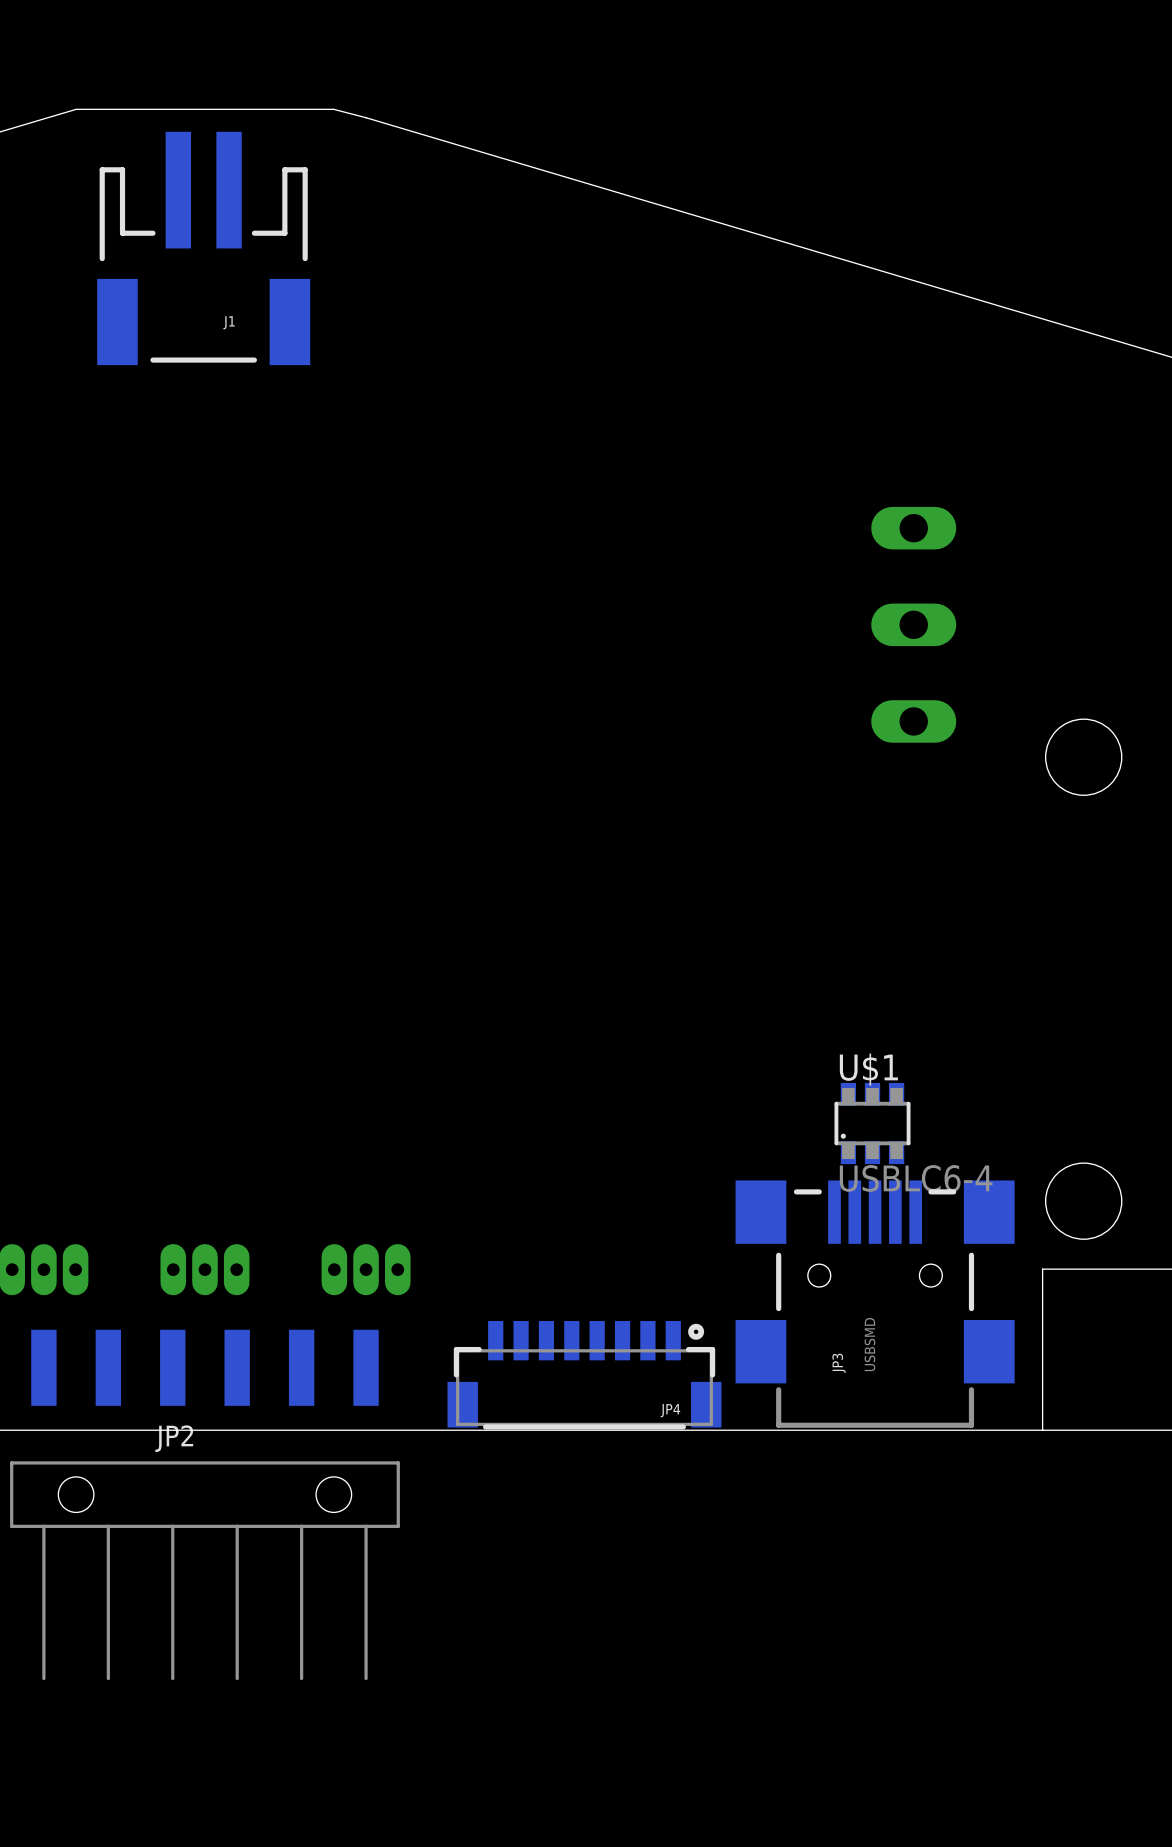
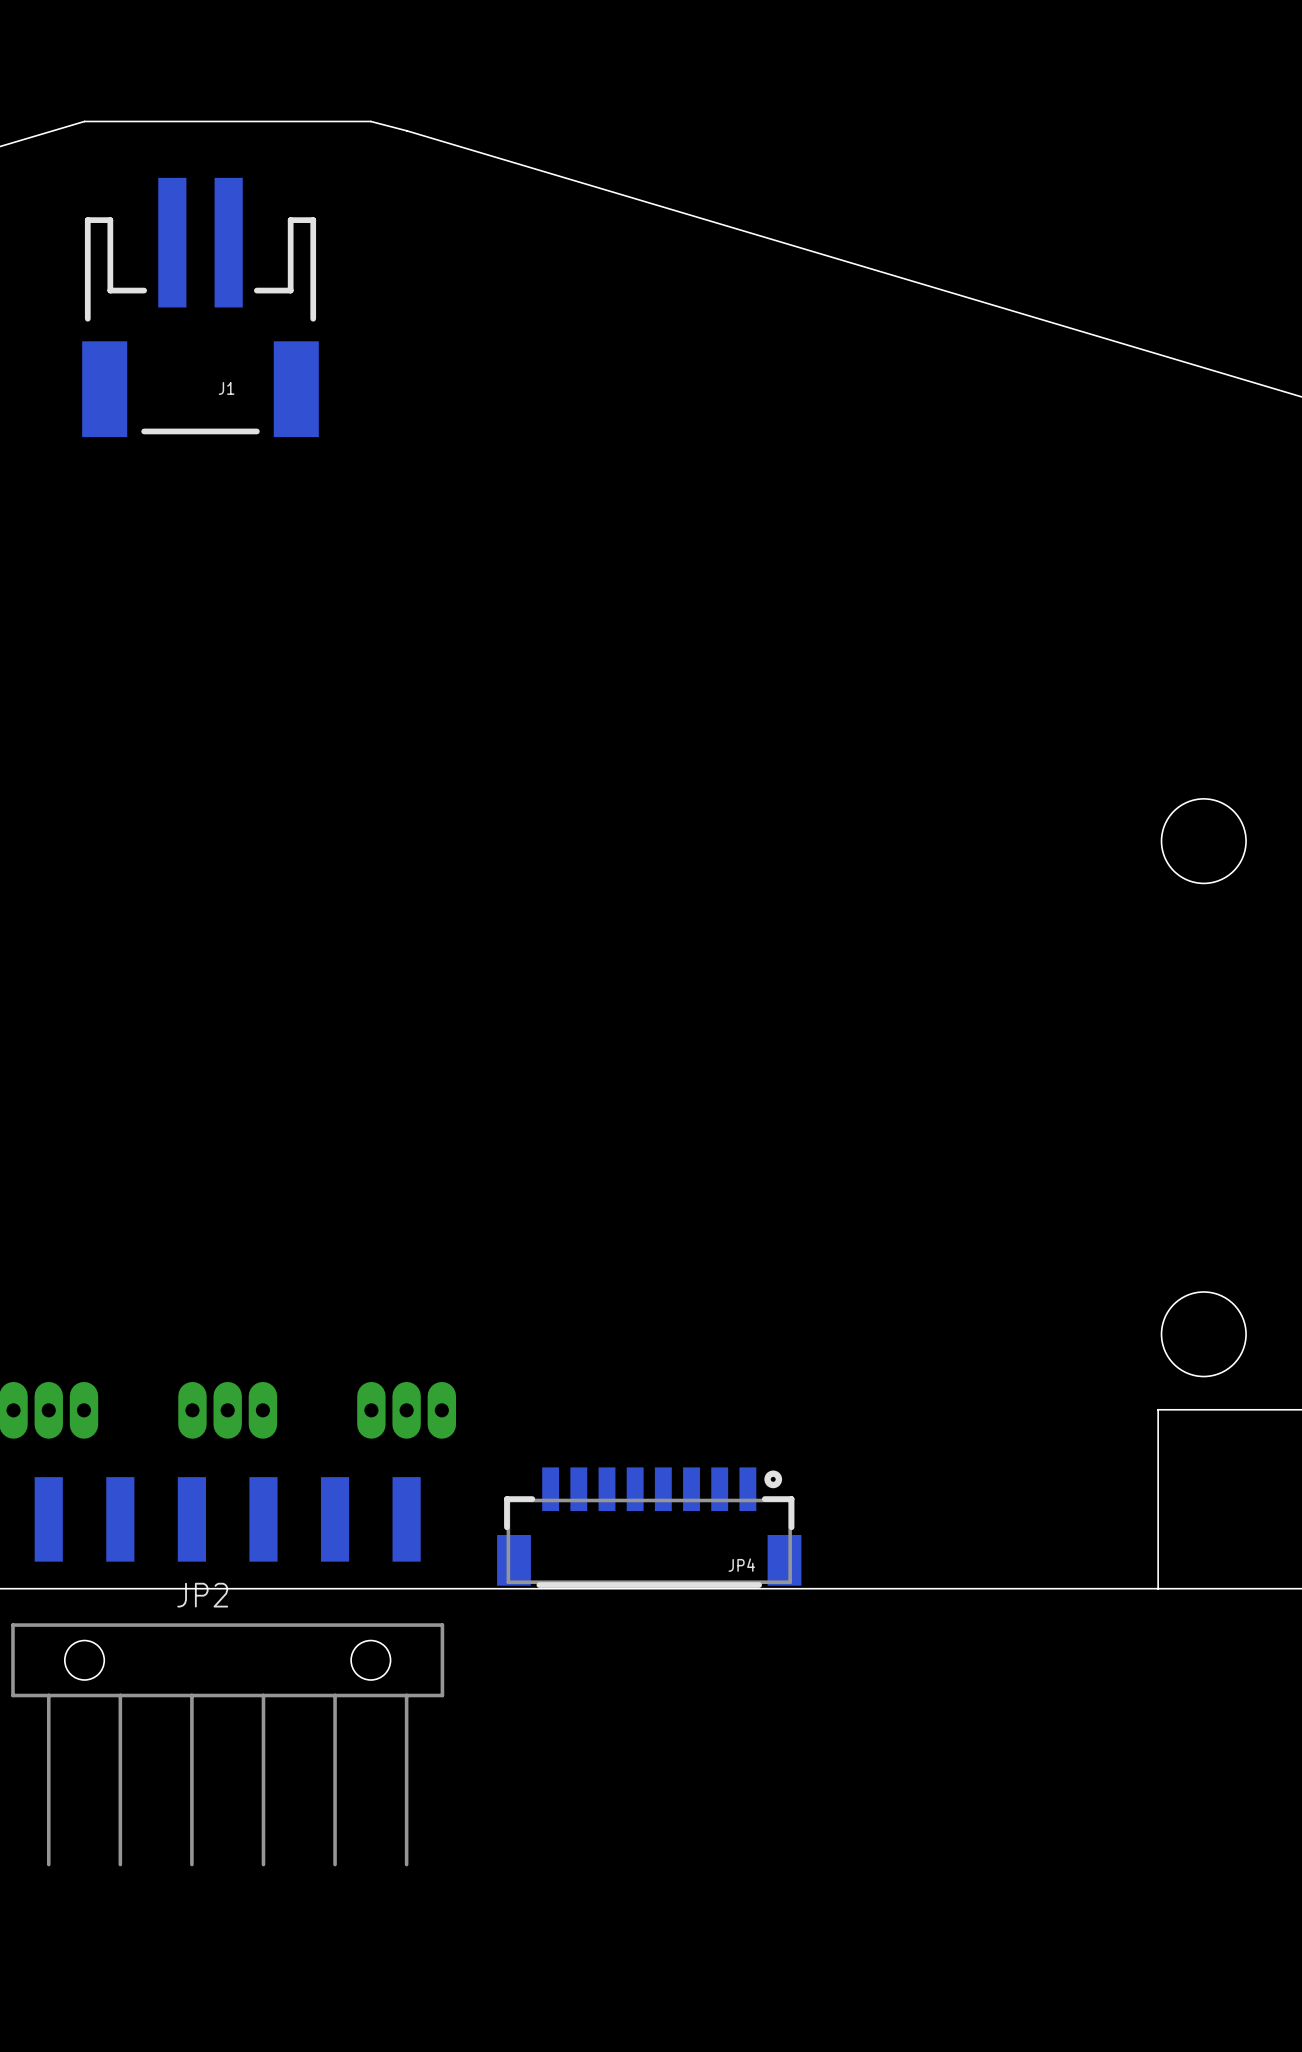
J1 position: (203, 248) -> (200, 307)
part: (913, 624) -> none
U$1: USBLC6-4 (872, 1123) -> none
JP3: USBSMD (875, 1304) -> none

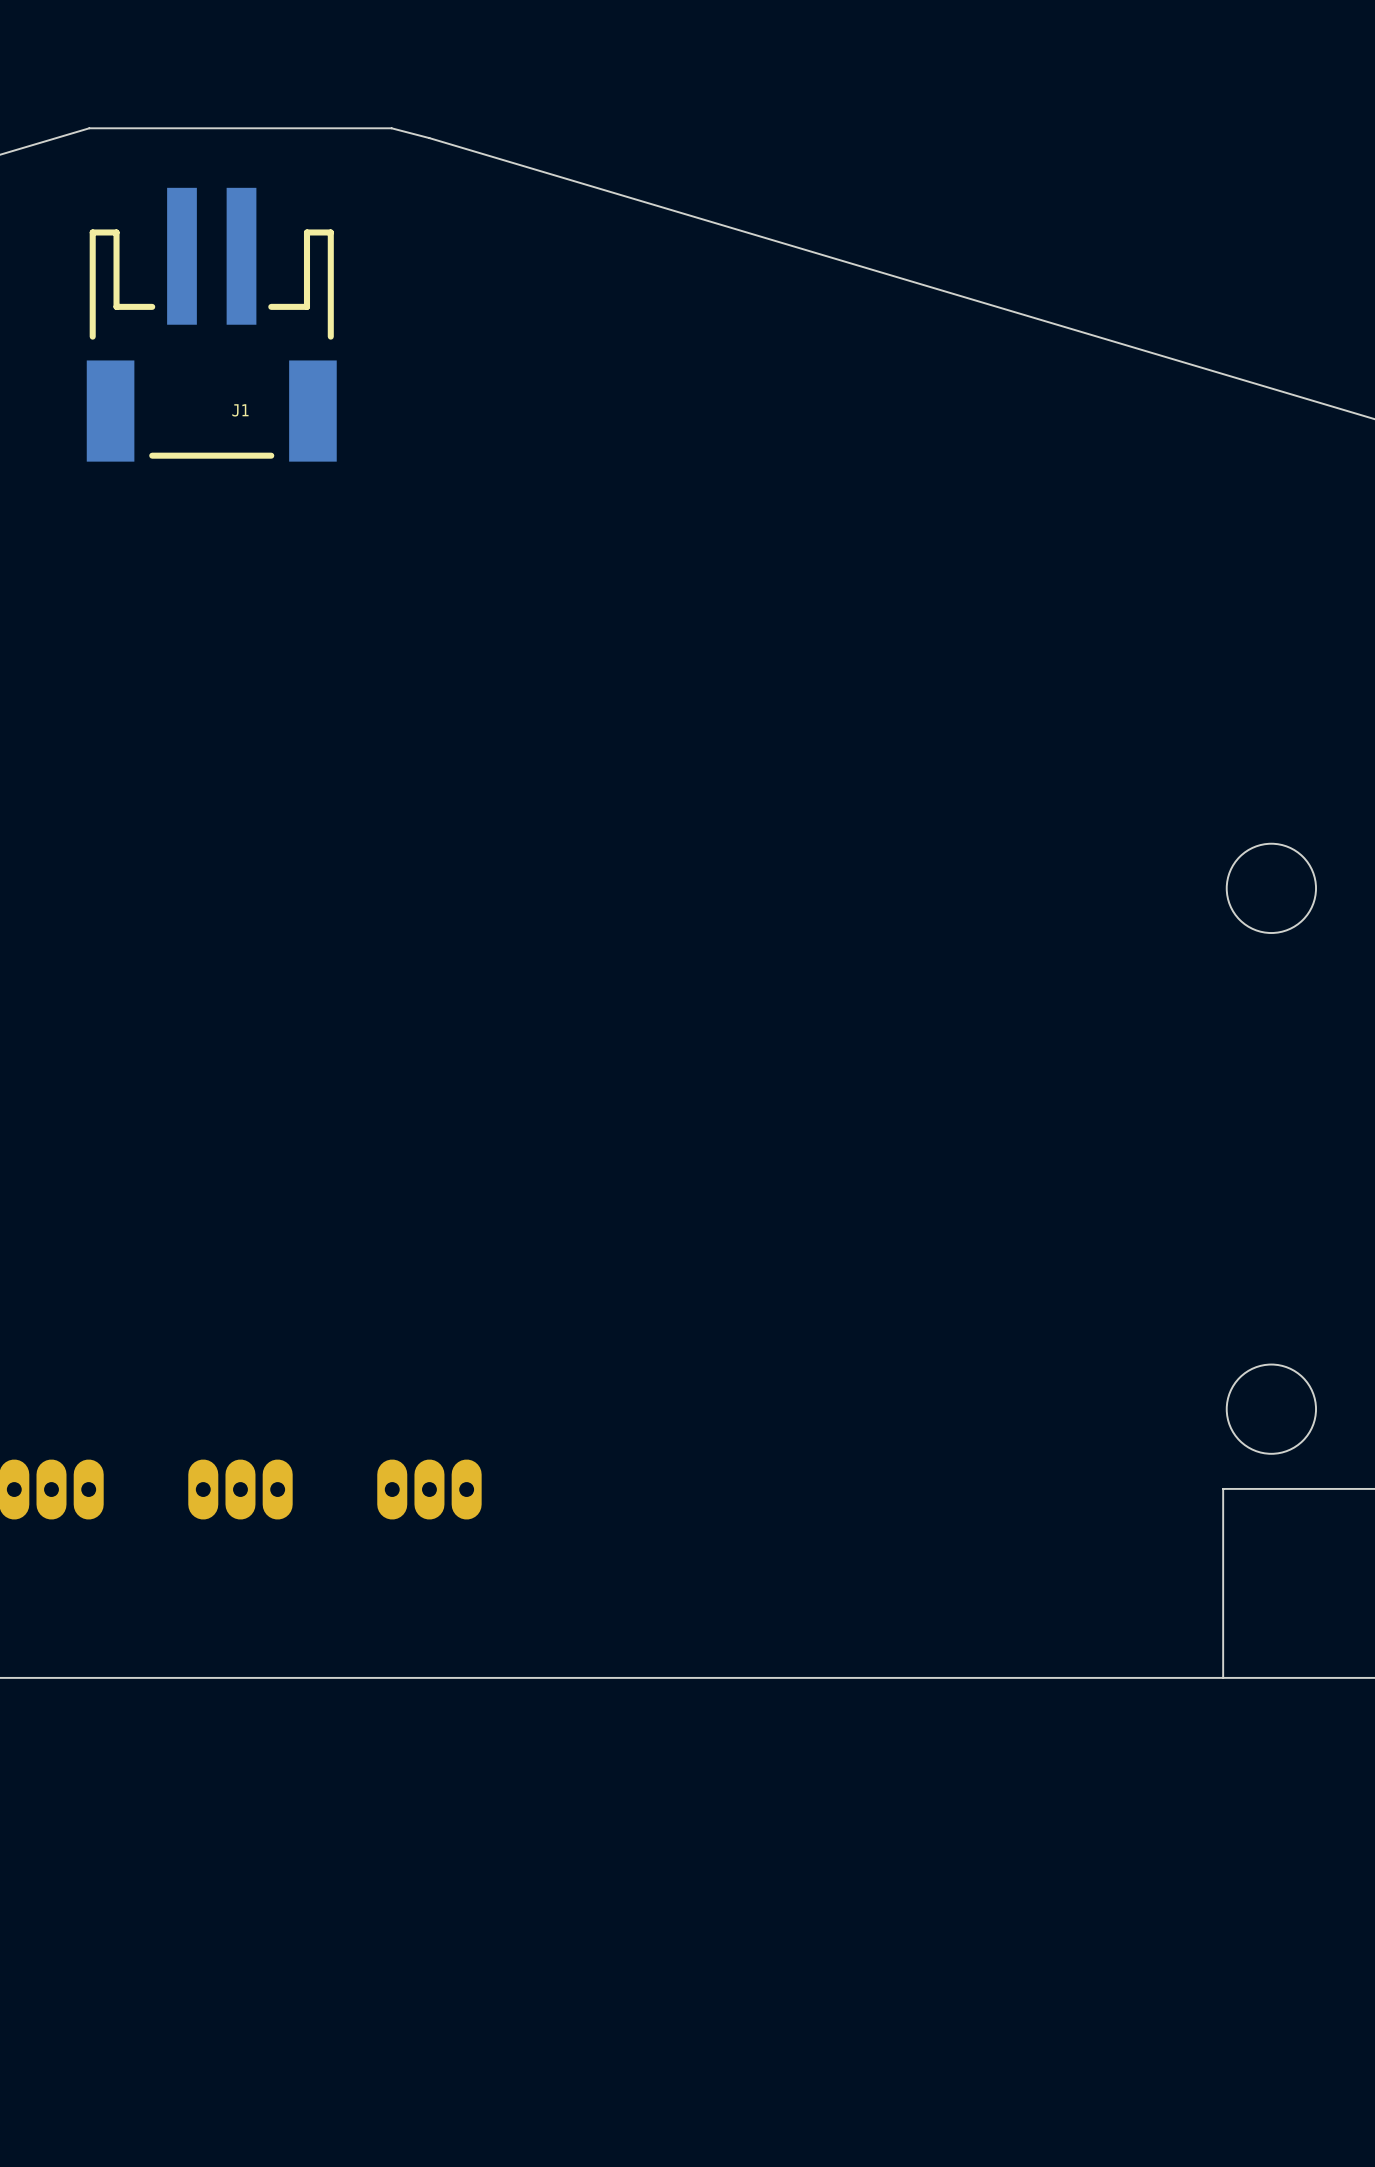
JP4: (649, 1527) -> none
JP2: (227, 1671) -> none

